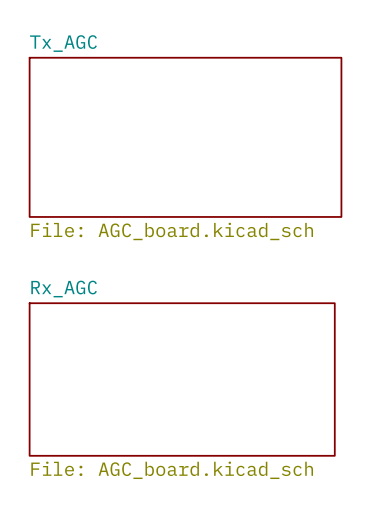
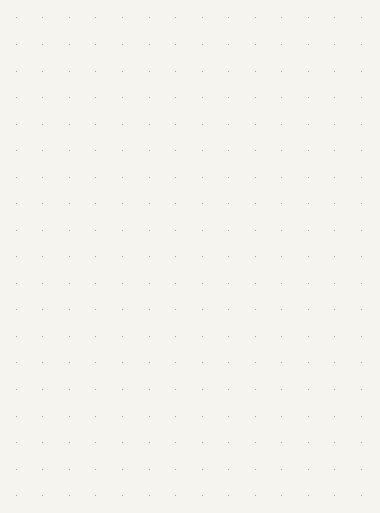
sheet Tx_AGC: File: AGC_board.kicad_sch (185, 137) -> none
sheet Rx_AGC: File: AGC_board.kicad_sch (182, 379) -> none

